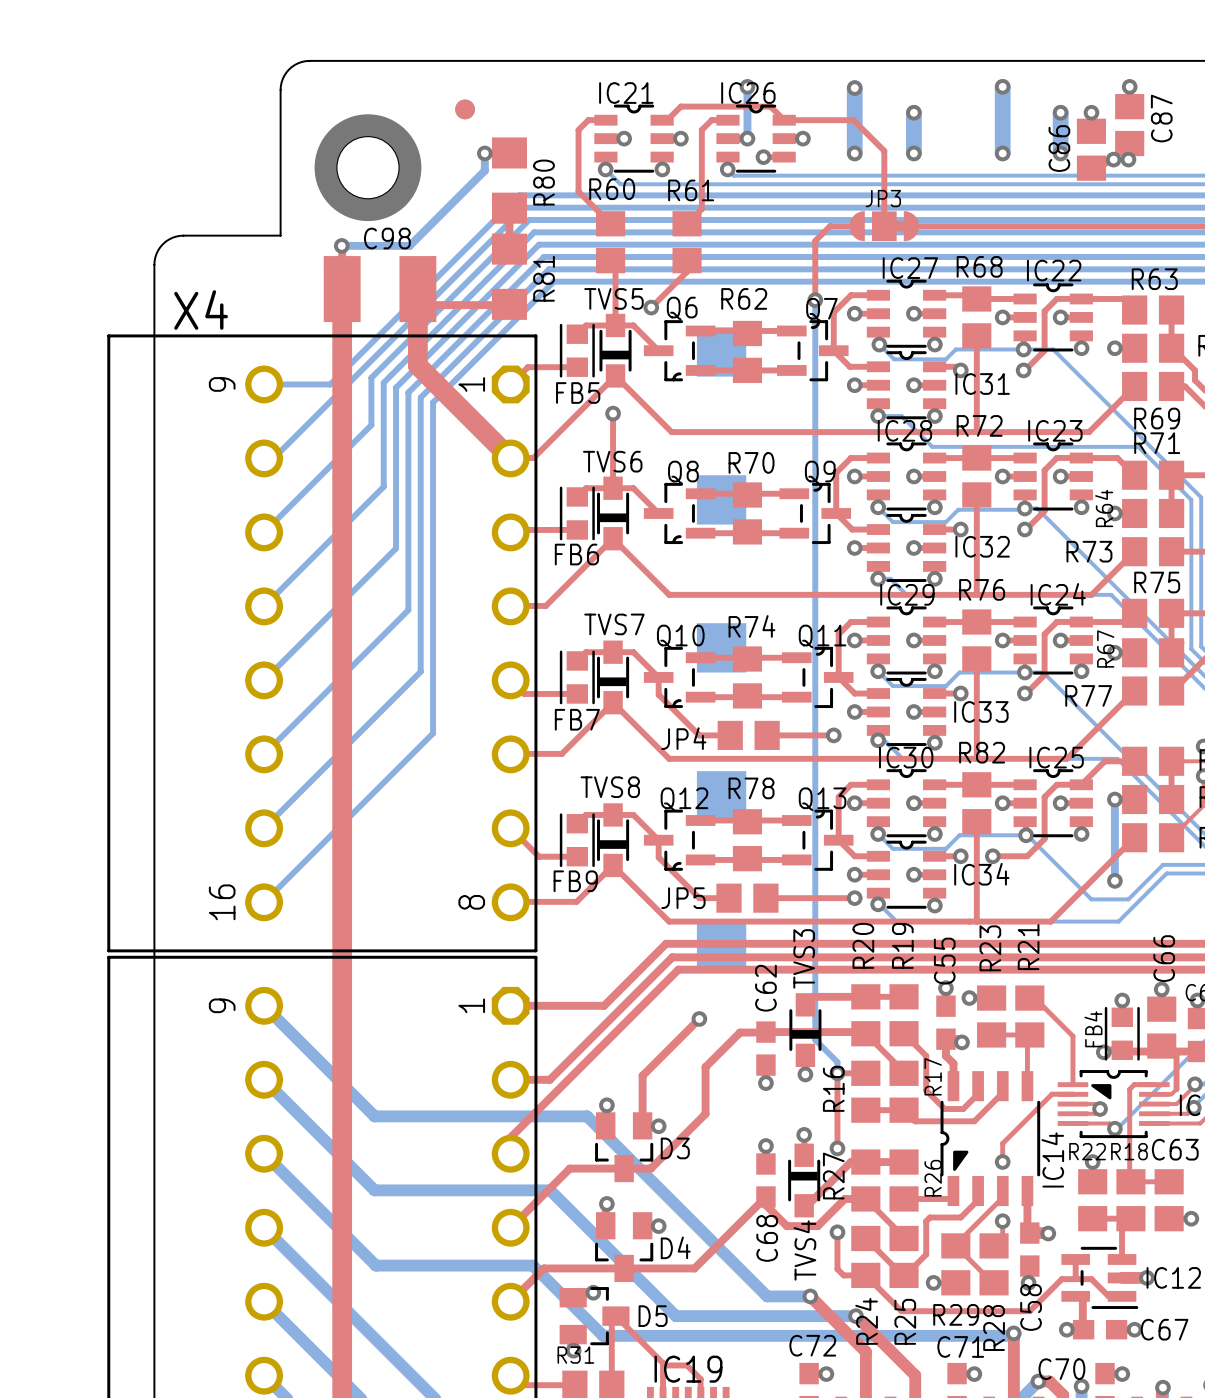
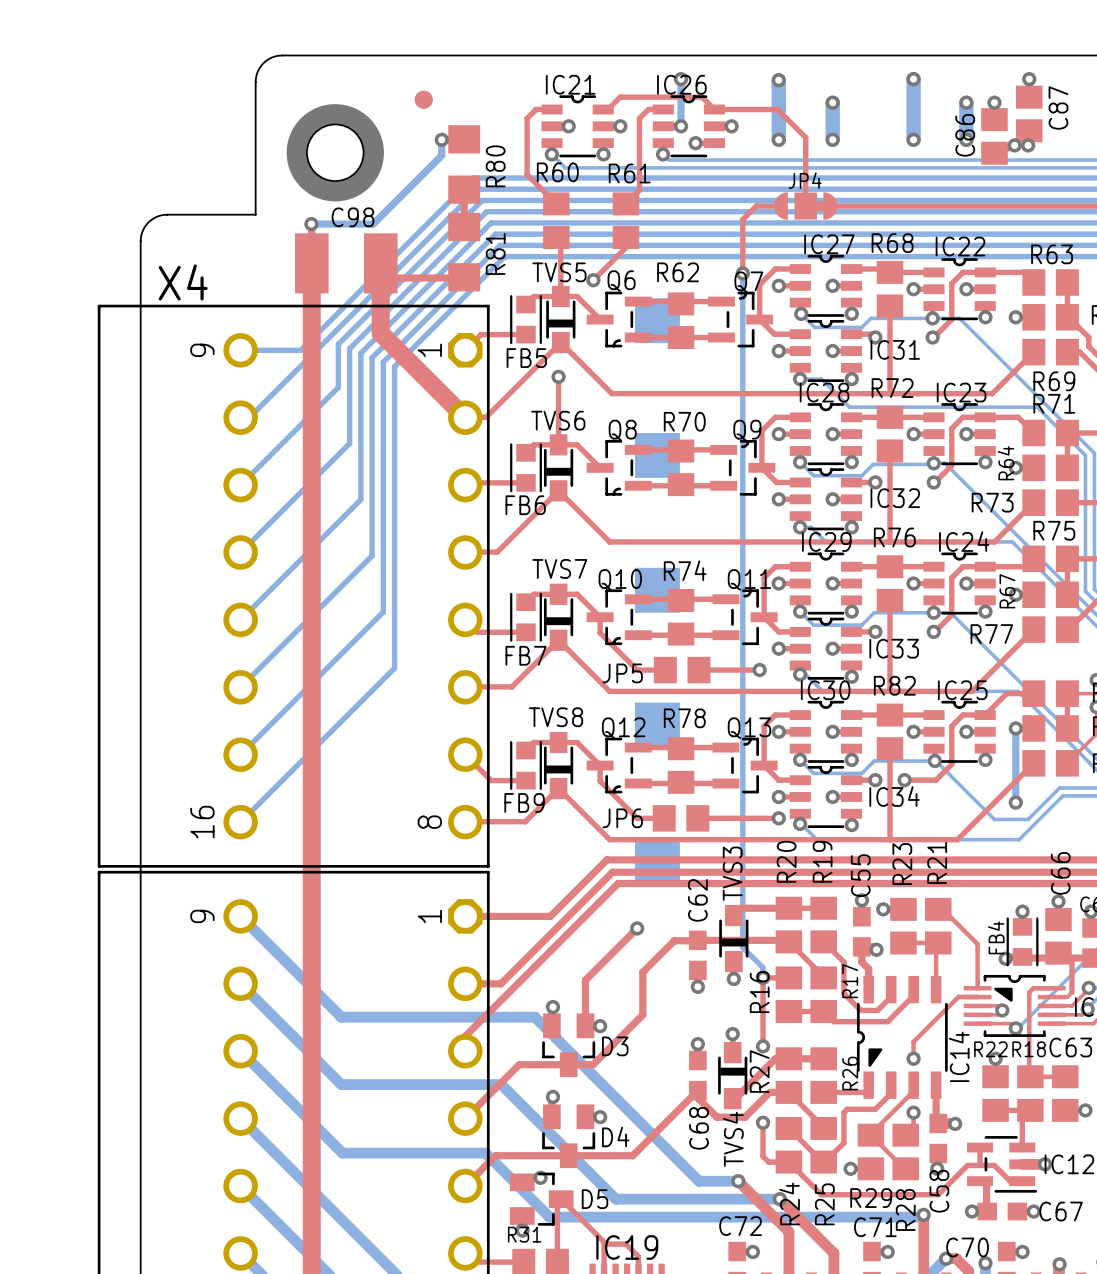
JP3 name: JP3 (883, 198) -> JP4 (805, 180)
JP4 name: JP4 (683, 738) -> JP5 (622, 673)
JP5 name: JP5 (683, 898) -> JP6 (622, 818)

